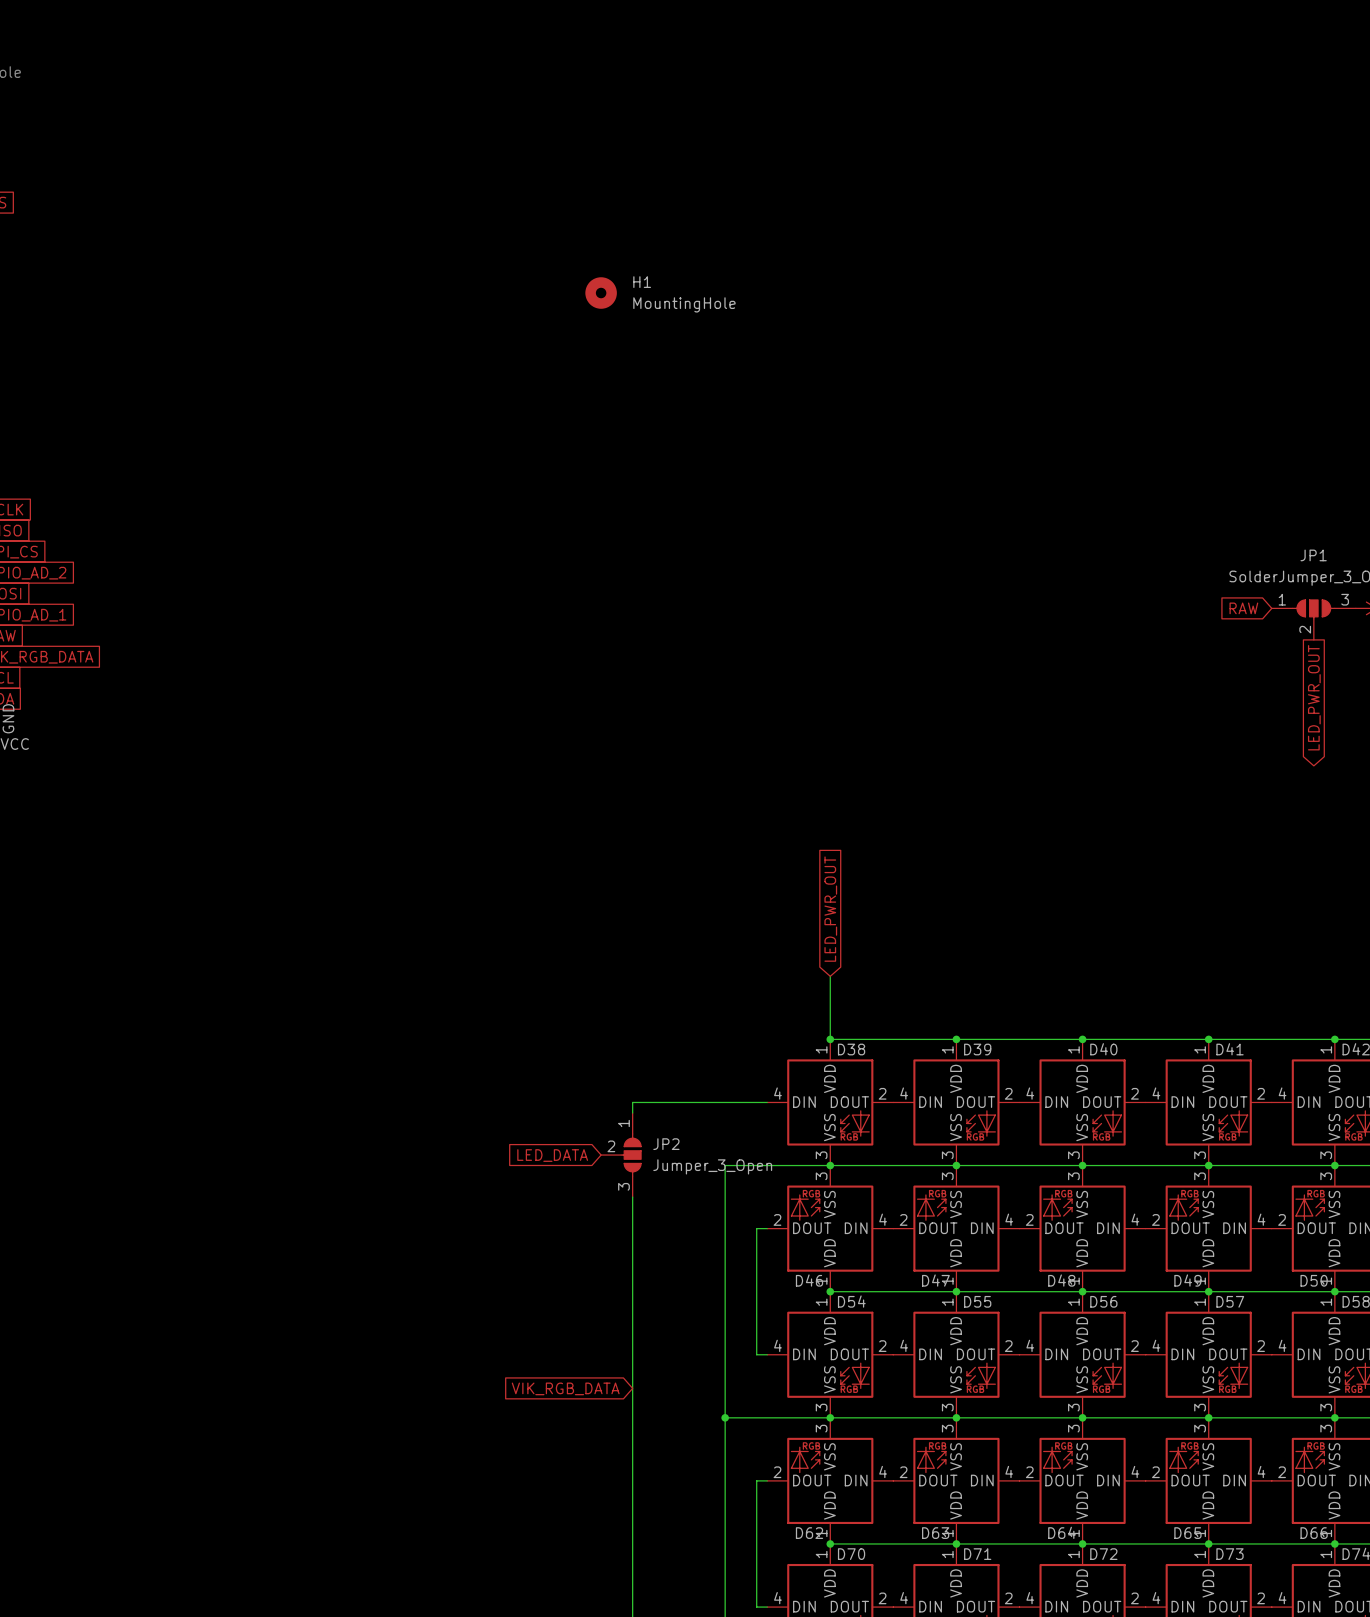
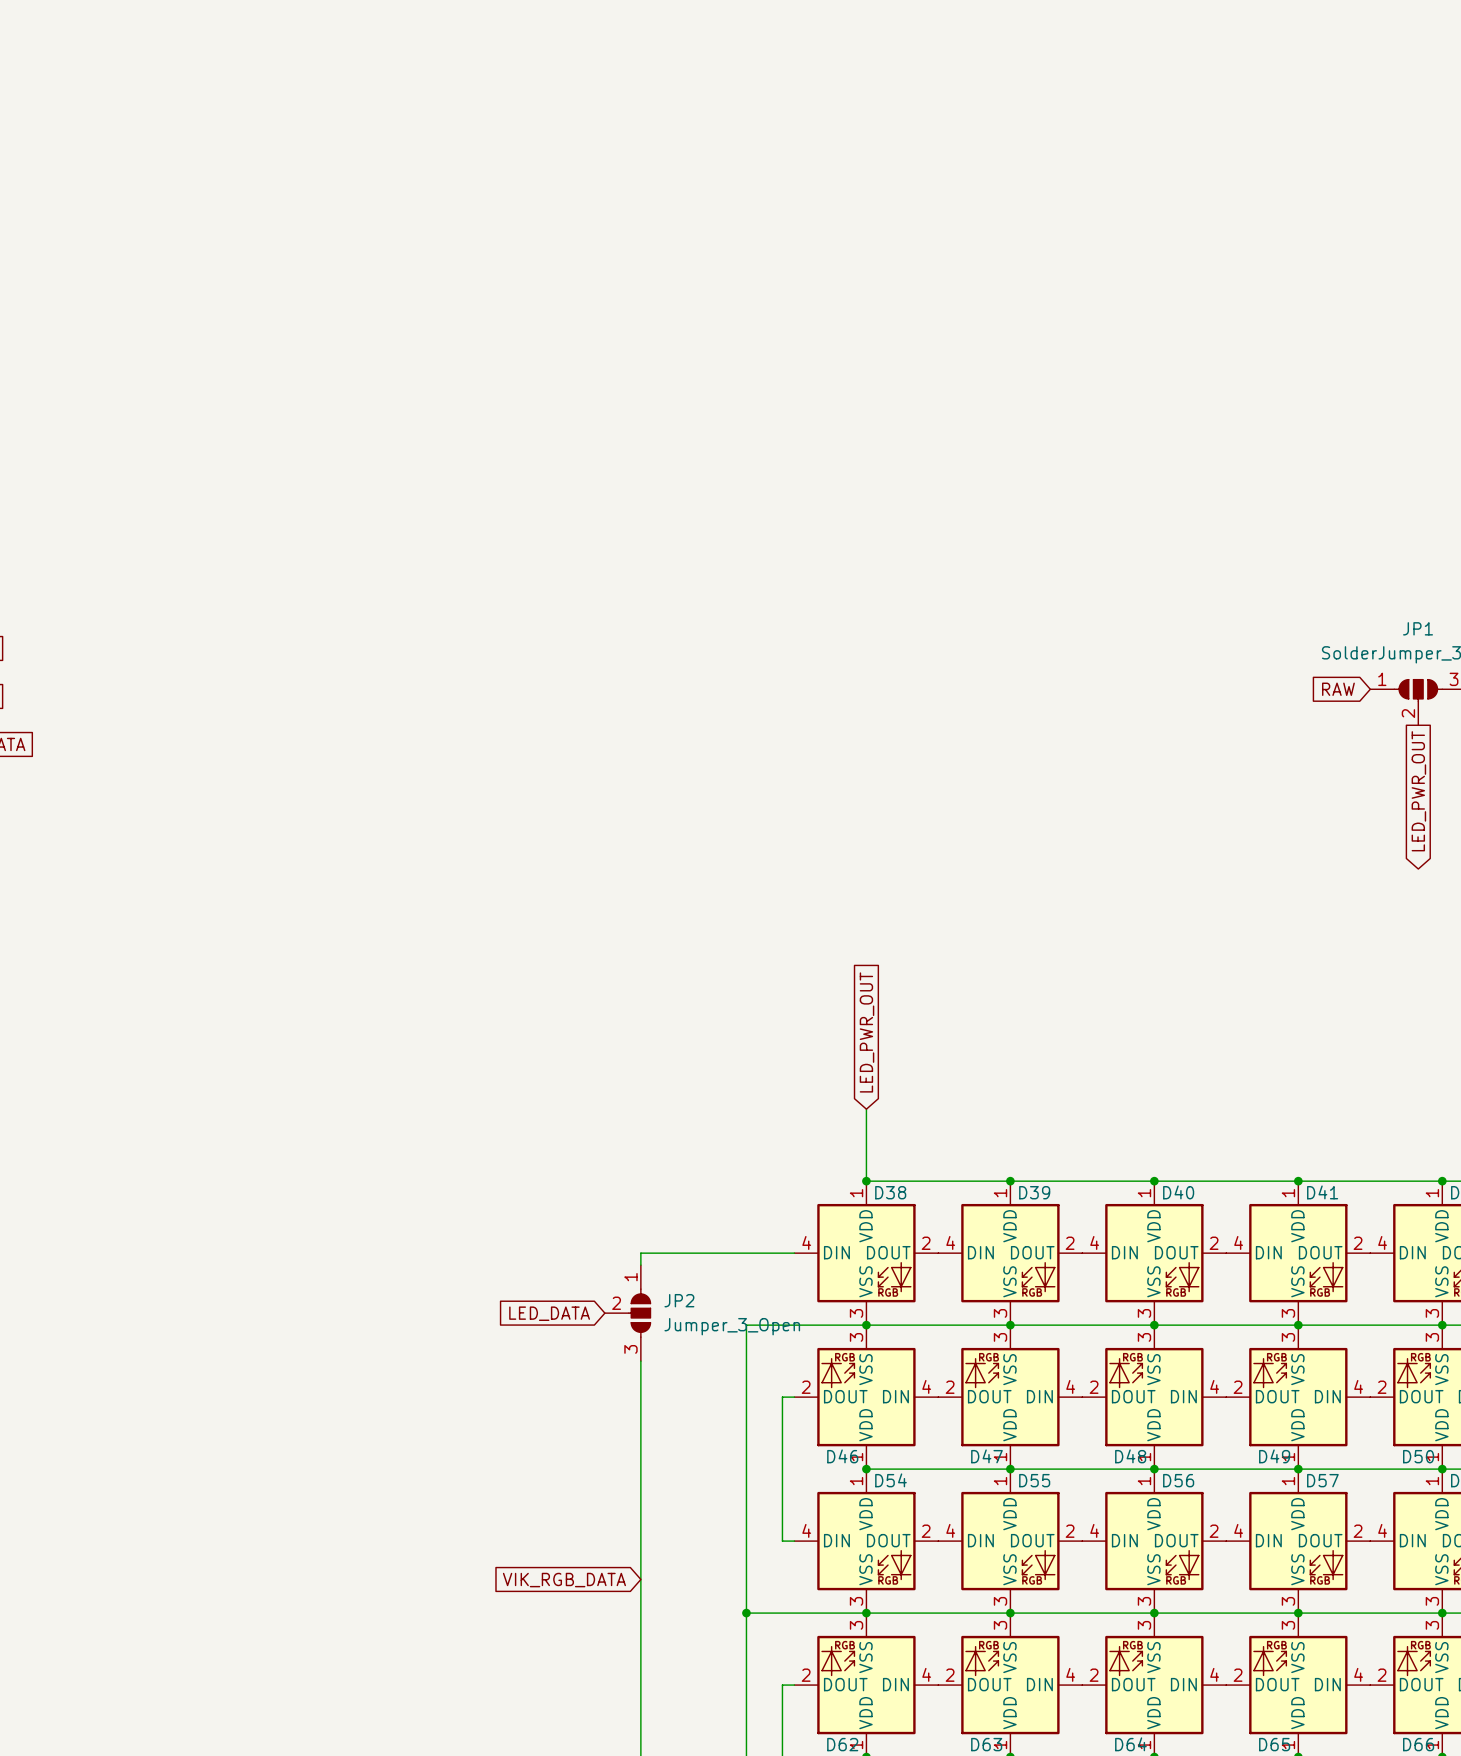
H1: MountingHole (601, 293) -> none

